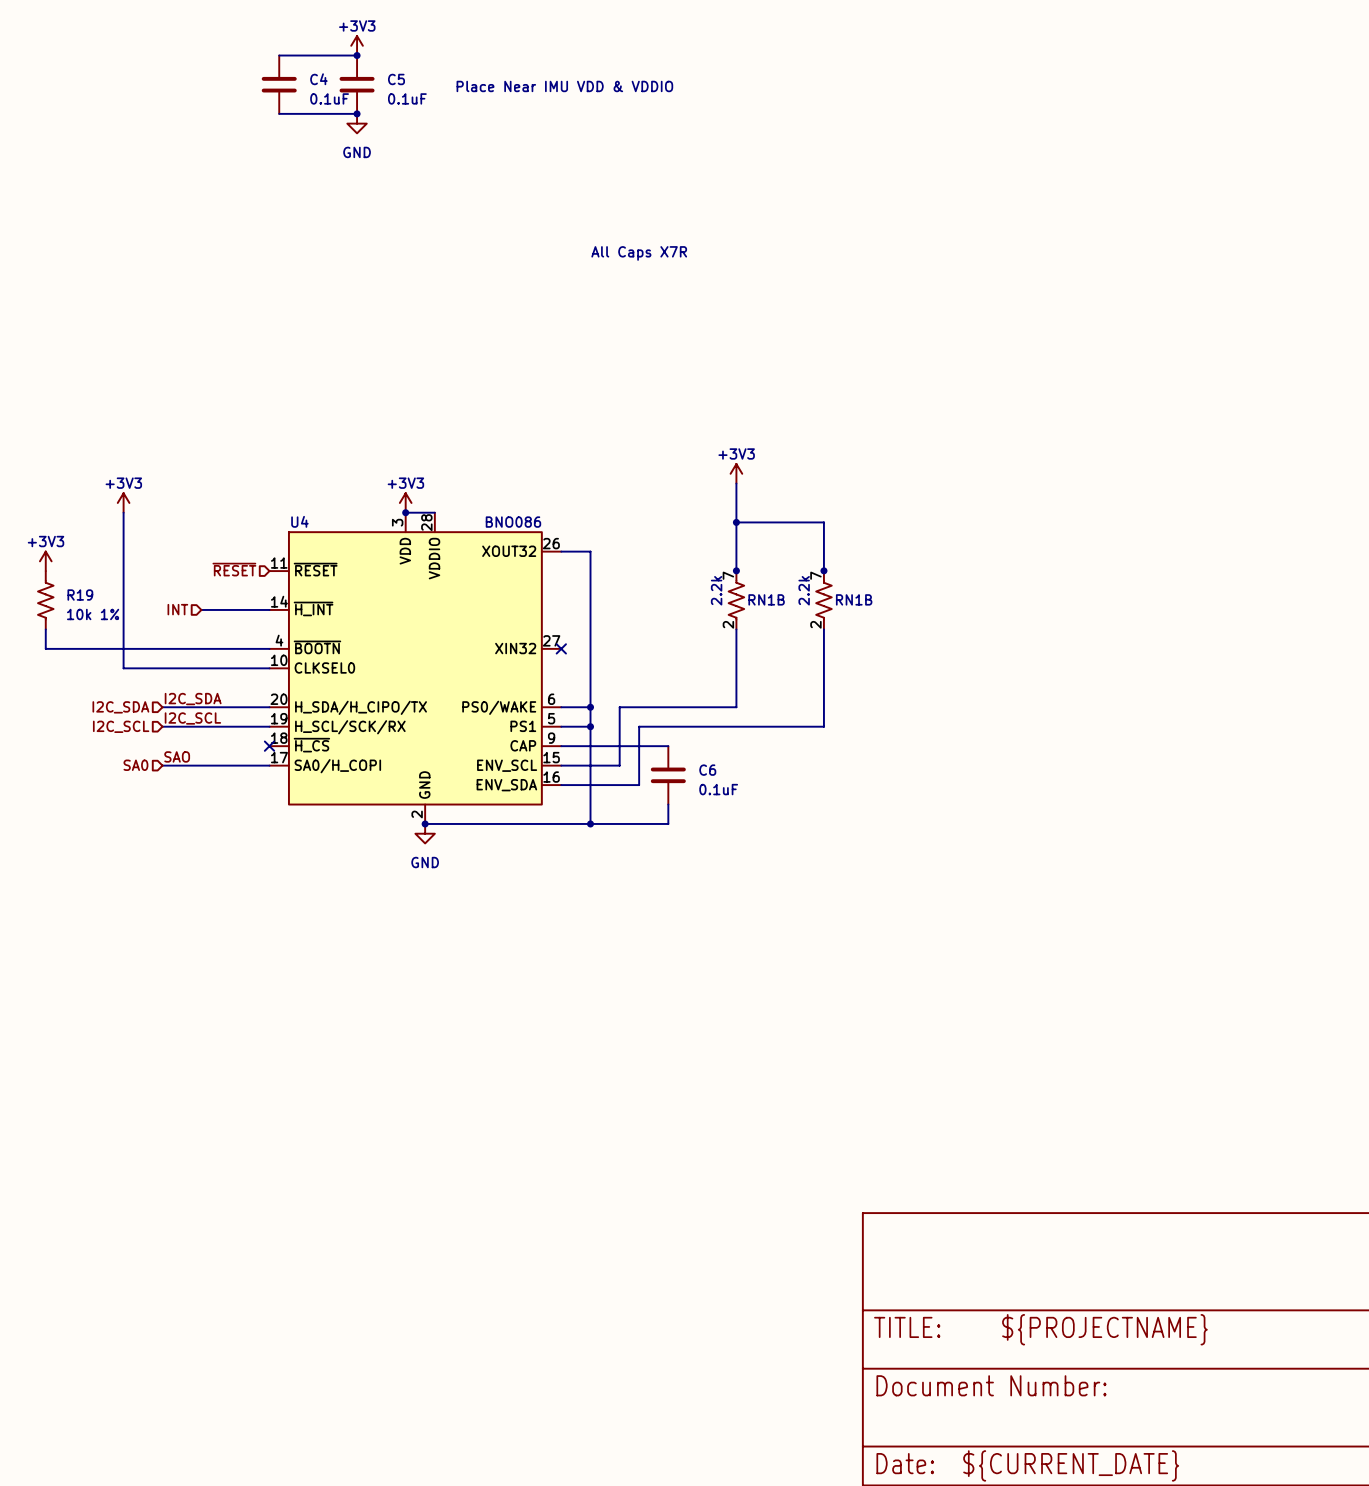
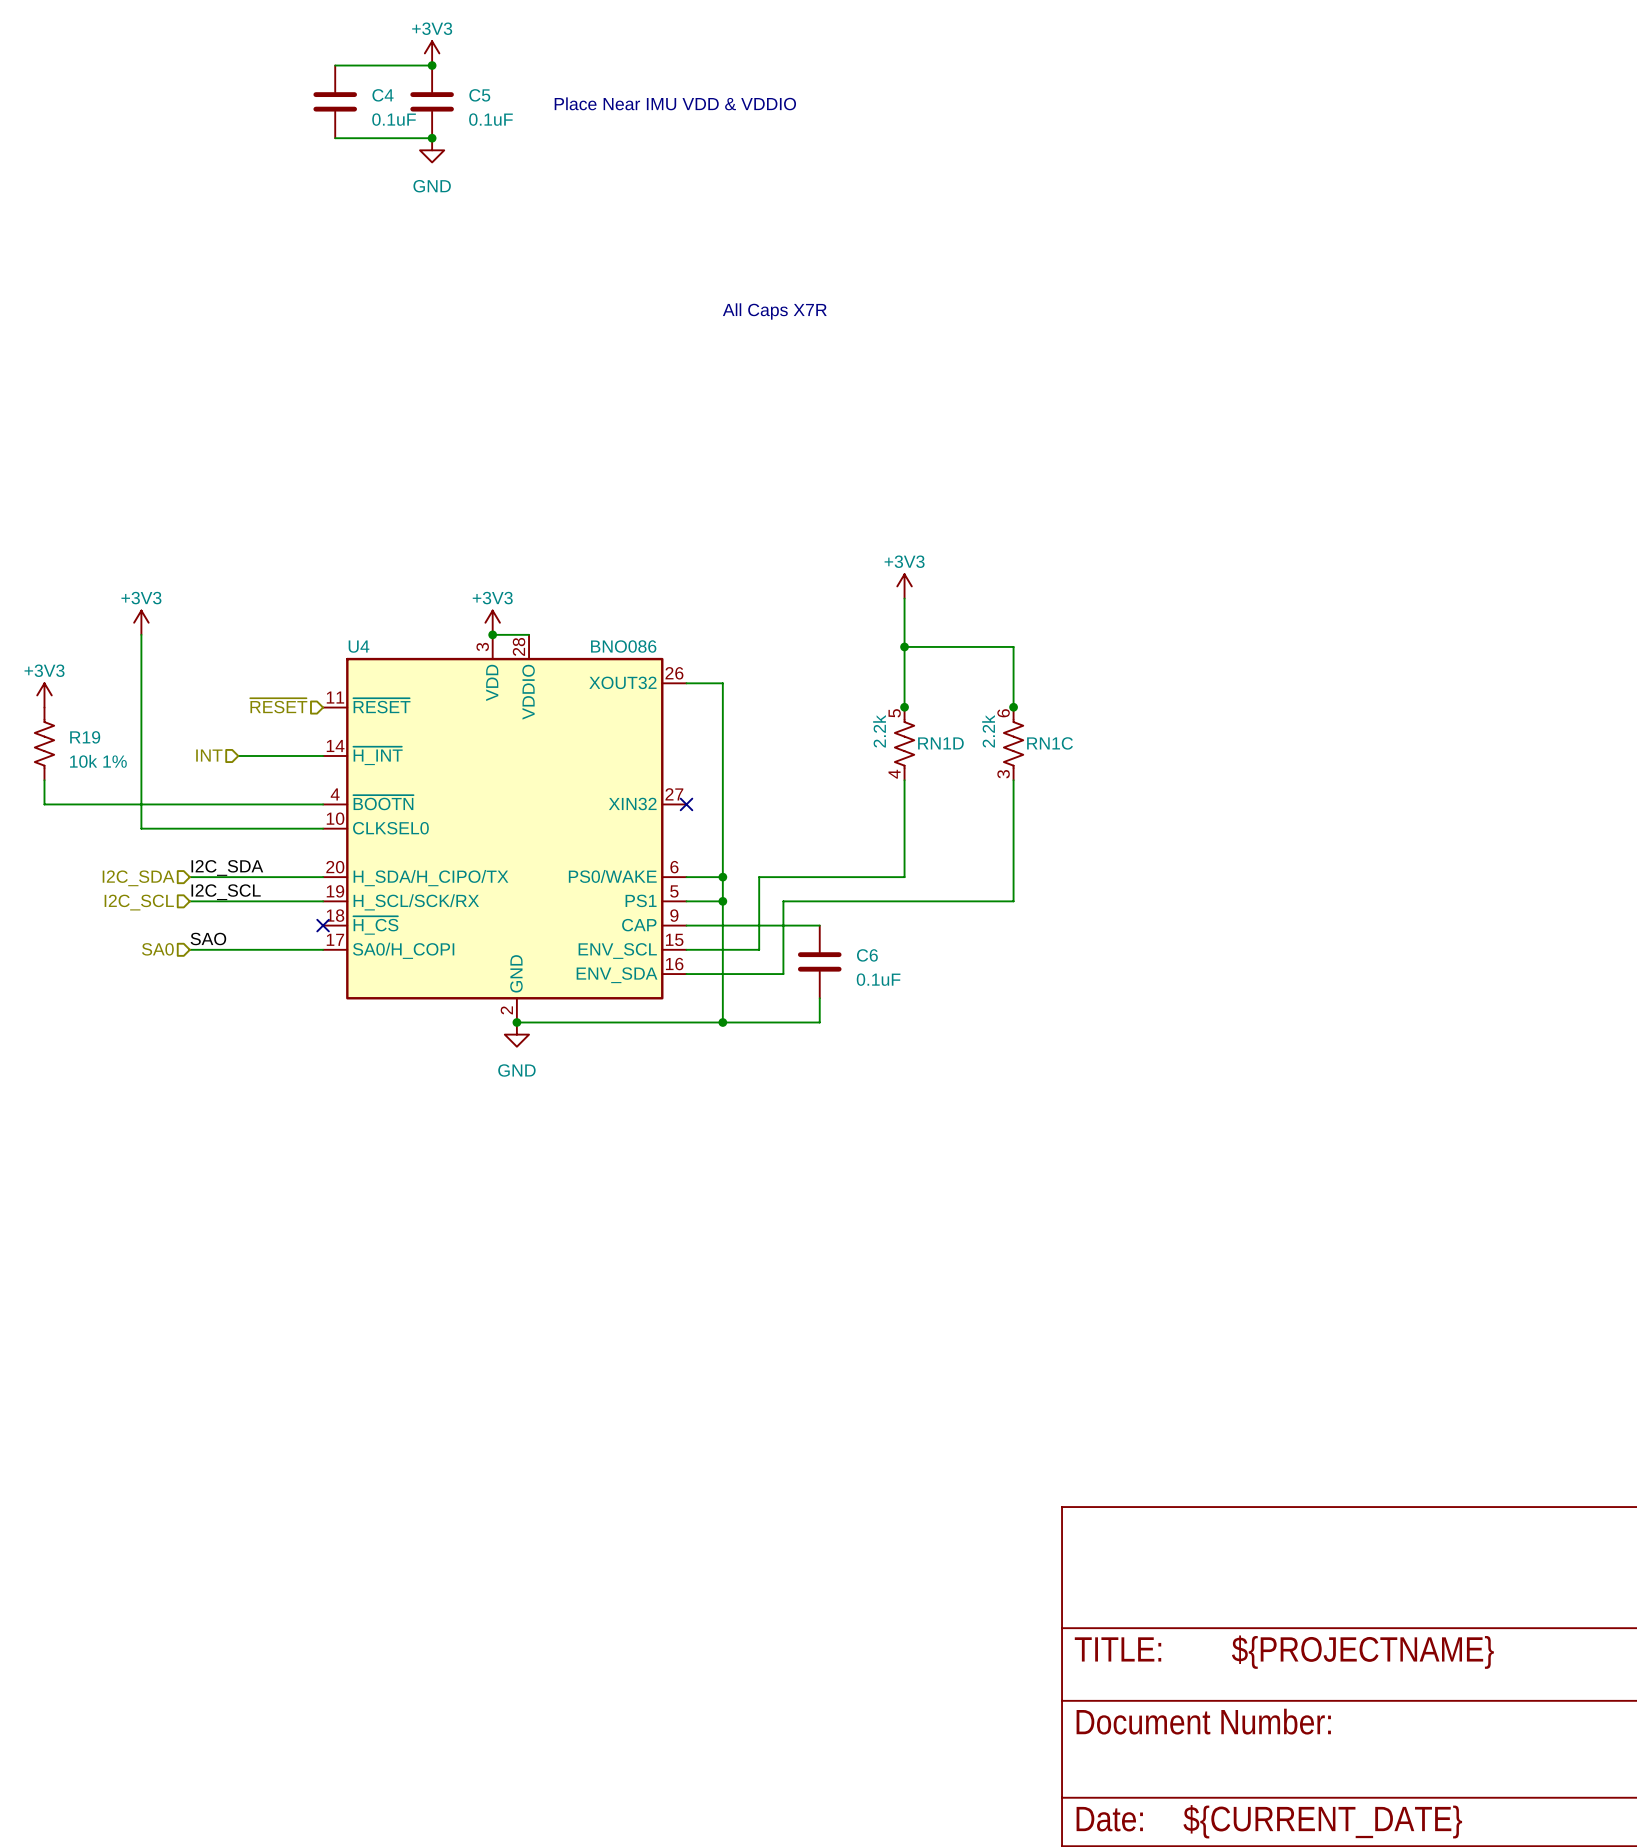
RN1B pin number: 7 (728, 575) -> 5 (894, 713)
RN1B pin number: 7 (815, 575) -> 6 (1003, 713)
RN1B name: RN1B (766, 599) -> RN1D (940, 743)
RN1B name: RN1B (854, 599) -> RN1C (1050, 743)
RN1B pin number: 2 (728, 624) -> 4 (894, 774)
RN1B pin number: 2 (815, 624) -> 3 (1003, 774)

